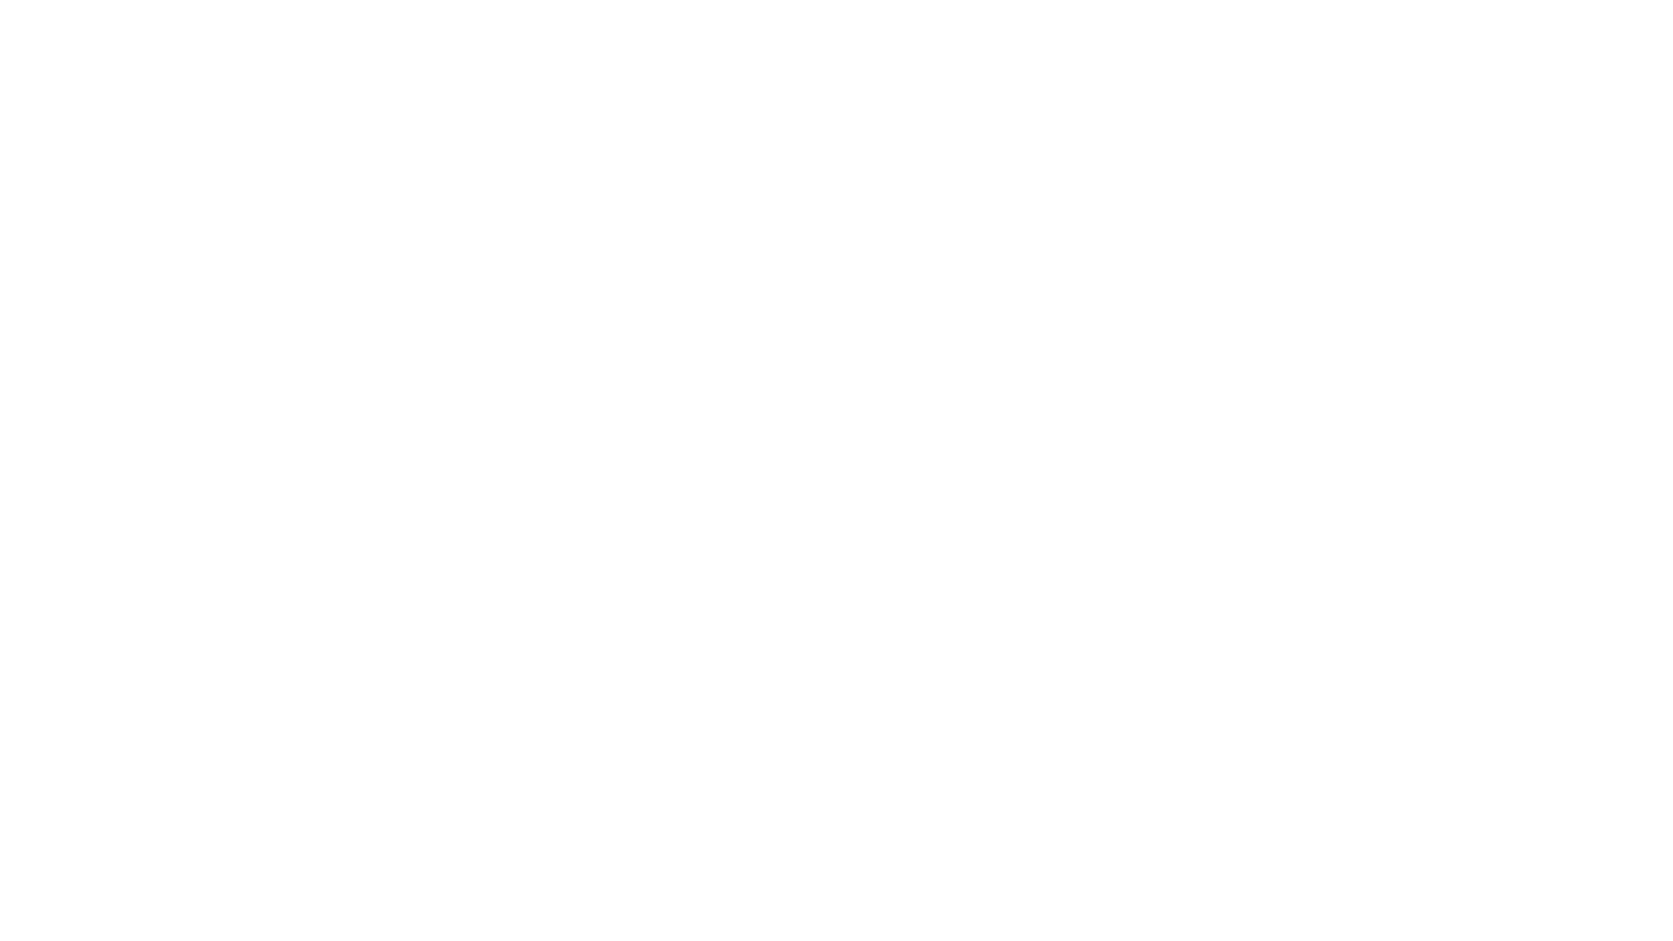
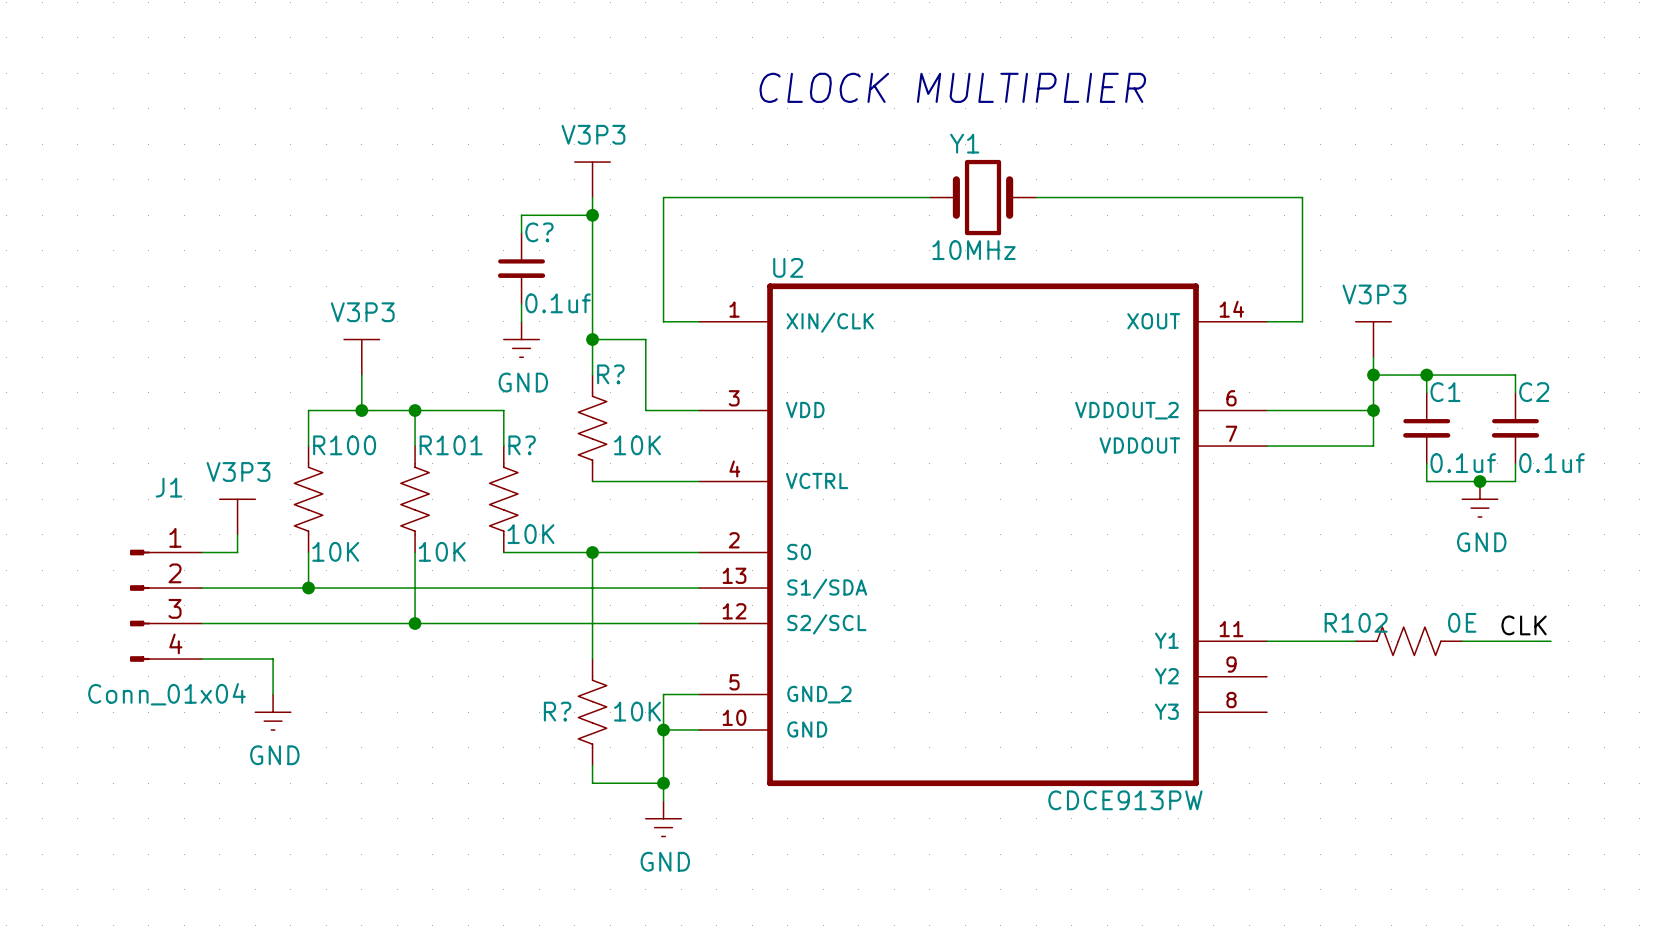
text: none -> CLOCK MULTIPLIER (952, 87)
power symbol: none -> V3P3 (592, 179)
wire: none -> (592, 197) (592, 375)
wire: none -> (929, 197) (663, 197) (663, 321) (699, 321)
Y1: none -> 10MHz (983, 197)
wire: none -> (1036, 197) (1302, 197) (1302, 321) (1266, 321)
wire: none -> (592, 215) (521, 215) (521, 233)
junction: none -> (592, 215)
C?: none -> 0.1uf (521, 268)
wire: none -> (521, 304) (521, 321)
power symbol: none -> GND (521, 339)
wire: none -> (592, 339) (645, 339) (645, 410) (699, 410)
junction: none -> (592, 339)
power symbol: none -> V3P3 (1373, 339)
power symbol: none -> V3P3 (361, 357)
wire: none -> (1373, 357) (1373, 446) (1266, 446)
wire: none -> (361, 375) (361, 410)
wire: none -> (1373, 375) (1515, 375) (1515, 392)
junction: none -> (1373, 375)
wire: none -> (1426, 375) (1426, 392)
junction: none -> (1426, 375)
junction: none -> (361, 410)
wire: none -> (415, 410) (415, 446)
junction: none -> (415, 410)
wire: none -> (1266, 410) (1373, 410)
junction: none -> (1373, 410)
R?: none -> 10K (592, 428)
C1: none -> 0.1uf (1426, 428)
C2: none -> 0.1uf (1515, 428)
wire: none -> (308, 446) (308, 410) (503, 410) (503, 446)
wire: none -> (1426, 463) (1426, 481) (1515, 481) (1515, 463)
wire: none -> (592, 481) (699, 481)
junction: none -> (1479, 481)
R100: none -> 10K (308, 499)
R101: none -> 10K (415, 499)
R?: none -> 10K (503, 499)
power symbol: none -> GND (1479, 499)
power symbol: none -> V3P3 (237, 517)
wire: none -> (237, 534) (237, 552) (202, 552)
U2: none -> CDCE913PW (983, 534)
wire: none -> (308, 552) (308, 588)
wire: none -> (415, 552) (415, 623)
wire: none -> (503, 552) (699, 552)
wire: none -> (592, 552) (592, 659)
junction: none -> (592, 552)
wire: none -> (202, 588) (699, 588)
junction: none -> (308, 588)
J1: none -> Conn_01x04 (166, 605)
wire: none -> (202, 623) (699, 623)
junction: none -> (415, 623)
label: none -> CLK (1524, 625)
wire: none -> (1266, 641) (1355, 641)
R102: none -> 0E (1408, 641)
wire: none -> (1462, 641) (1550, 641)
wire: none -> (202, 659) (273, 659) (273, 694)
wire: none -> (699, 694) (663, 694) (663, 801)
power symbol: none -> GND (273, 712)
R?: none -> 10K (592, 712)
wire: none -> (663, 730) (699, 730)
junction: none -> (663, 730)
wire: none -> (592, 765) (592, 783) (663, 783)
junction: none -> (663, 783)
power symbol: none -> GND (663, 818)

